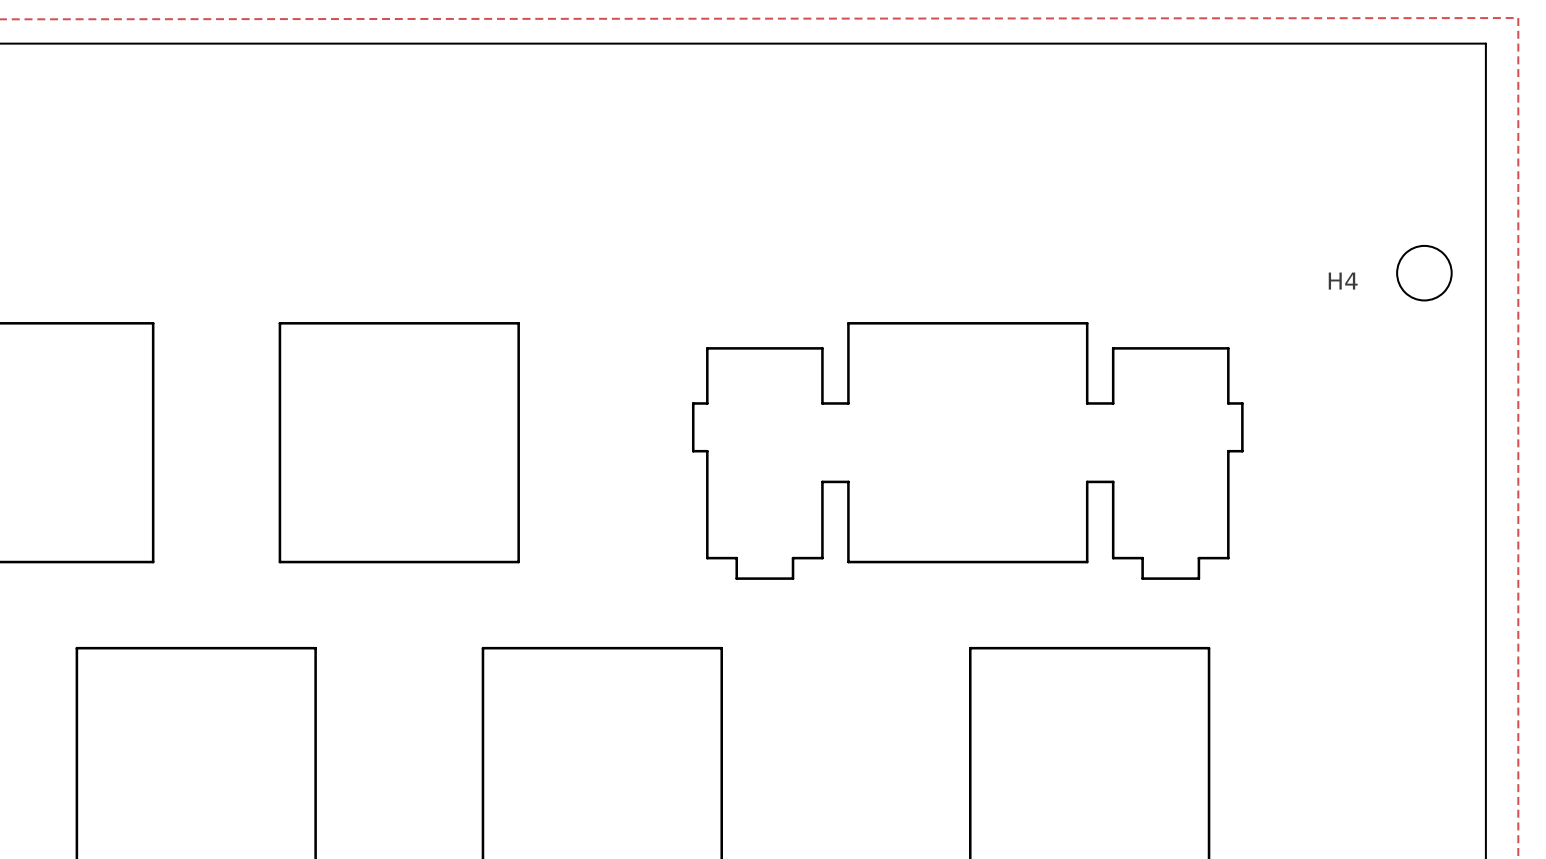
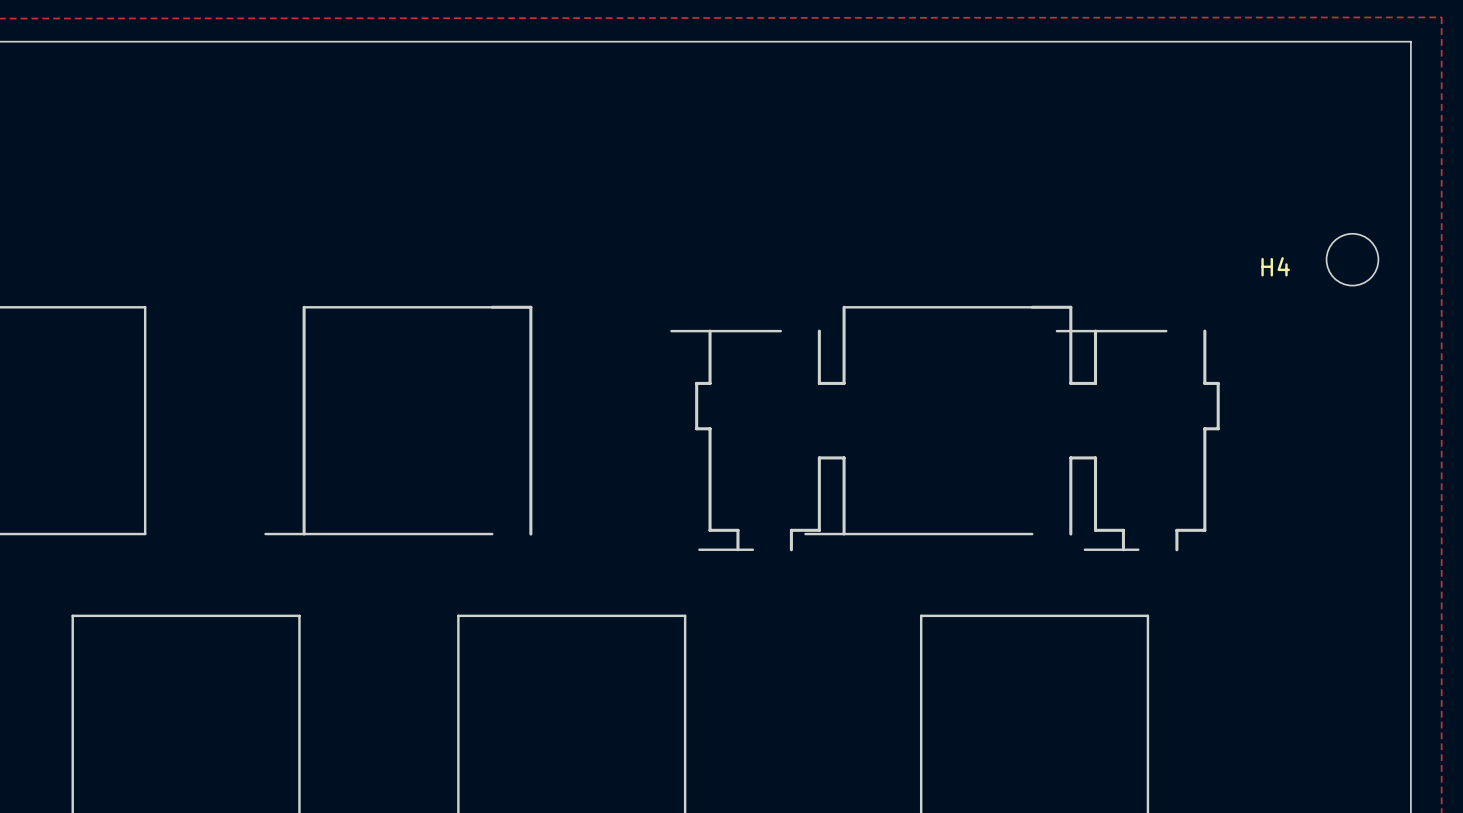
board edge: (320, 323) (279, 323) (279, 562) -> (304, 307) (304, 534)
board edge: (518, 323) (518, 562) -> (492, 307) (530, 307) (530, 534)
board edge: (889, 323) (848, 323) (848, 403) (822, 403) (822, 348) -> (844, 307) (844, 383) (819, 383) (819, 331)
board edge: (1087, 323) (1087, 403) (1113, 403) (1113, 348) -> (1032, 307) (1070, 307) (1070, 383) (1095, 383) (1095, 331)
board edge: (707, 348) (707, 403) (693, 403) (693, 451) (707, 451) (707, 558) (736, 558) (736, 578) -> (710, 331) (710, 383) (696, 383) (696, 428) (710, 428) (710, 530) (737, 530) (737, 549)
board edge: (1228, 348) (1228, 403) (1242, 403) (1242, 451) (1228, 451) (1228, 558) (1198, 558) (1198, 578) -> (1204, 331) (1204, 383) (1218, 383) (1218, 428) (1204, 428) (1204, 530) (1176, 530) (1176, 549)
board edge: (848, 562) (848, 481) (822, 481) (822, 558) (793, 558) (793, 578) -> (844, 534) (844, 457) (819, 457) (819, 530) (791, 530) (791, 549)
board edge: (1087, 562) (1087, 481) (1113, 481) (1113, 558) (1142, 558) (1142, 578) -> (1070, 534) (1070, 457) (1095, 457) (1095, 530) (1123, 530) (1123, 549)

